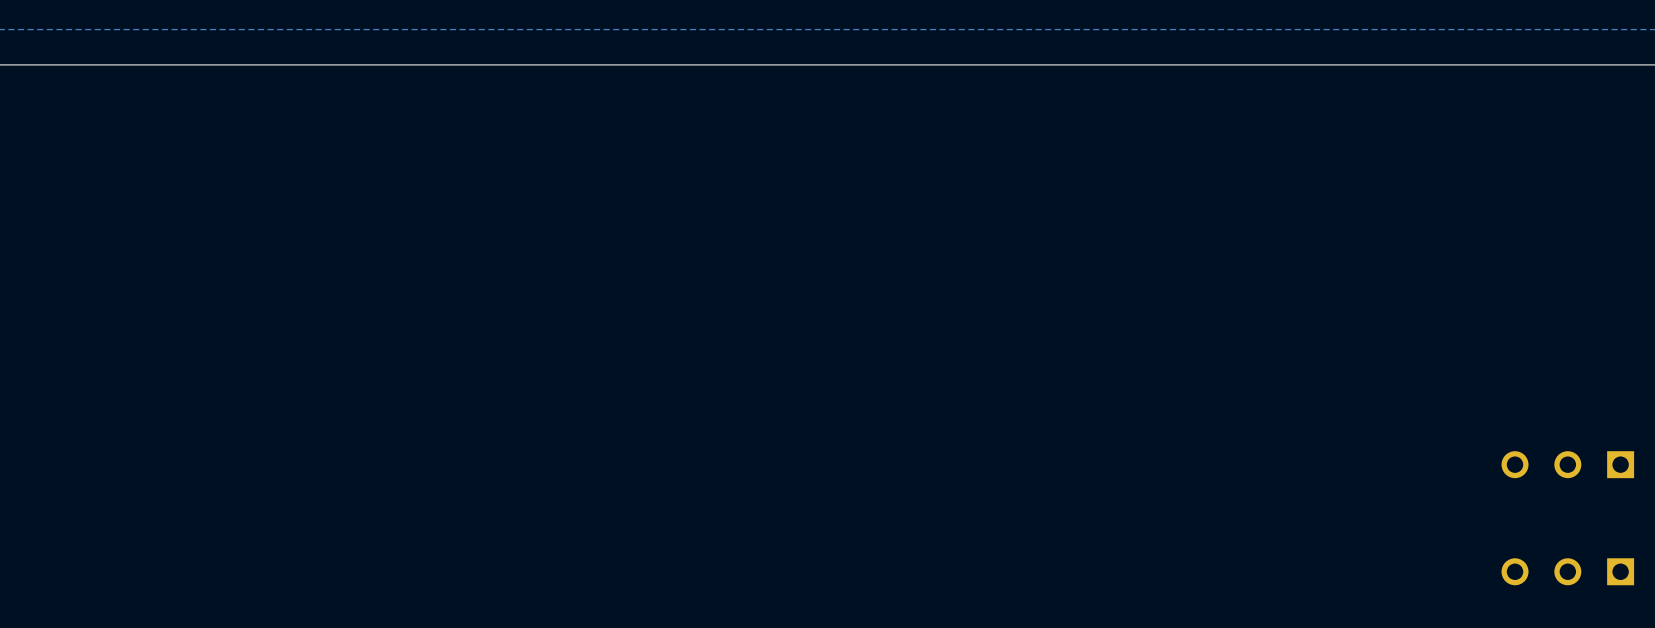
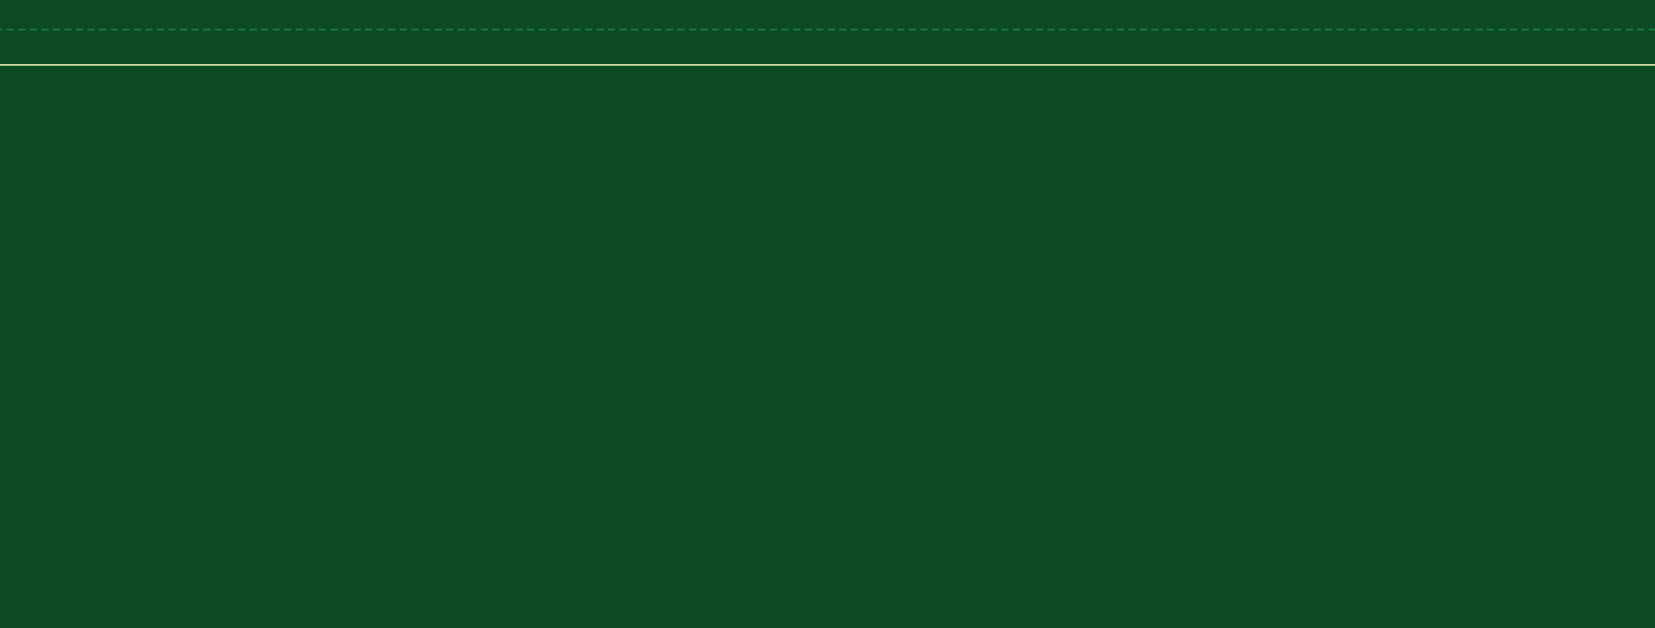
part: (1567, 464) -> none
part: (1567, 571) -> none

